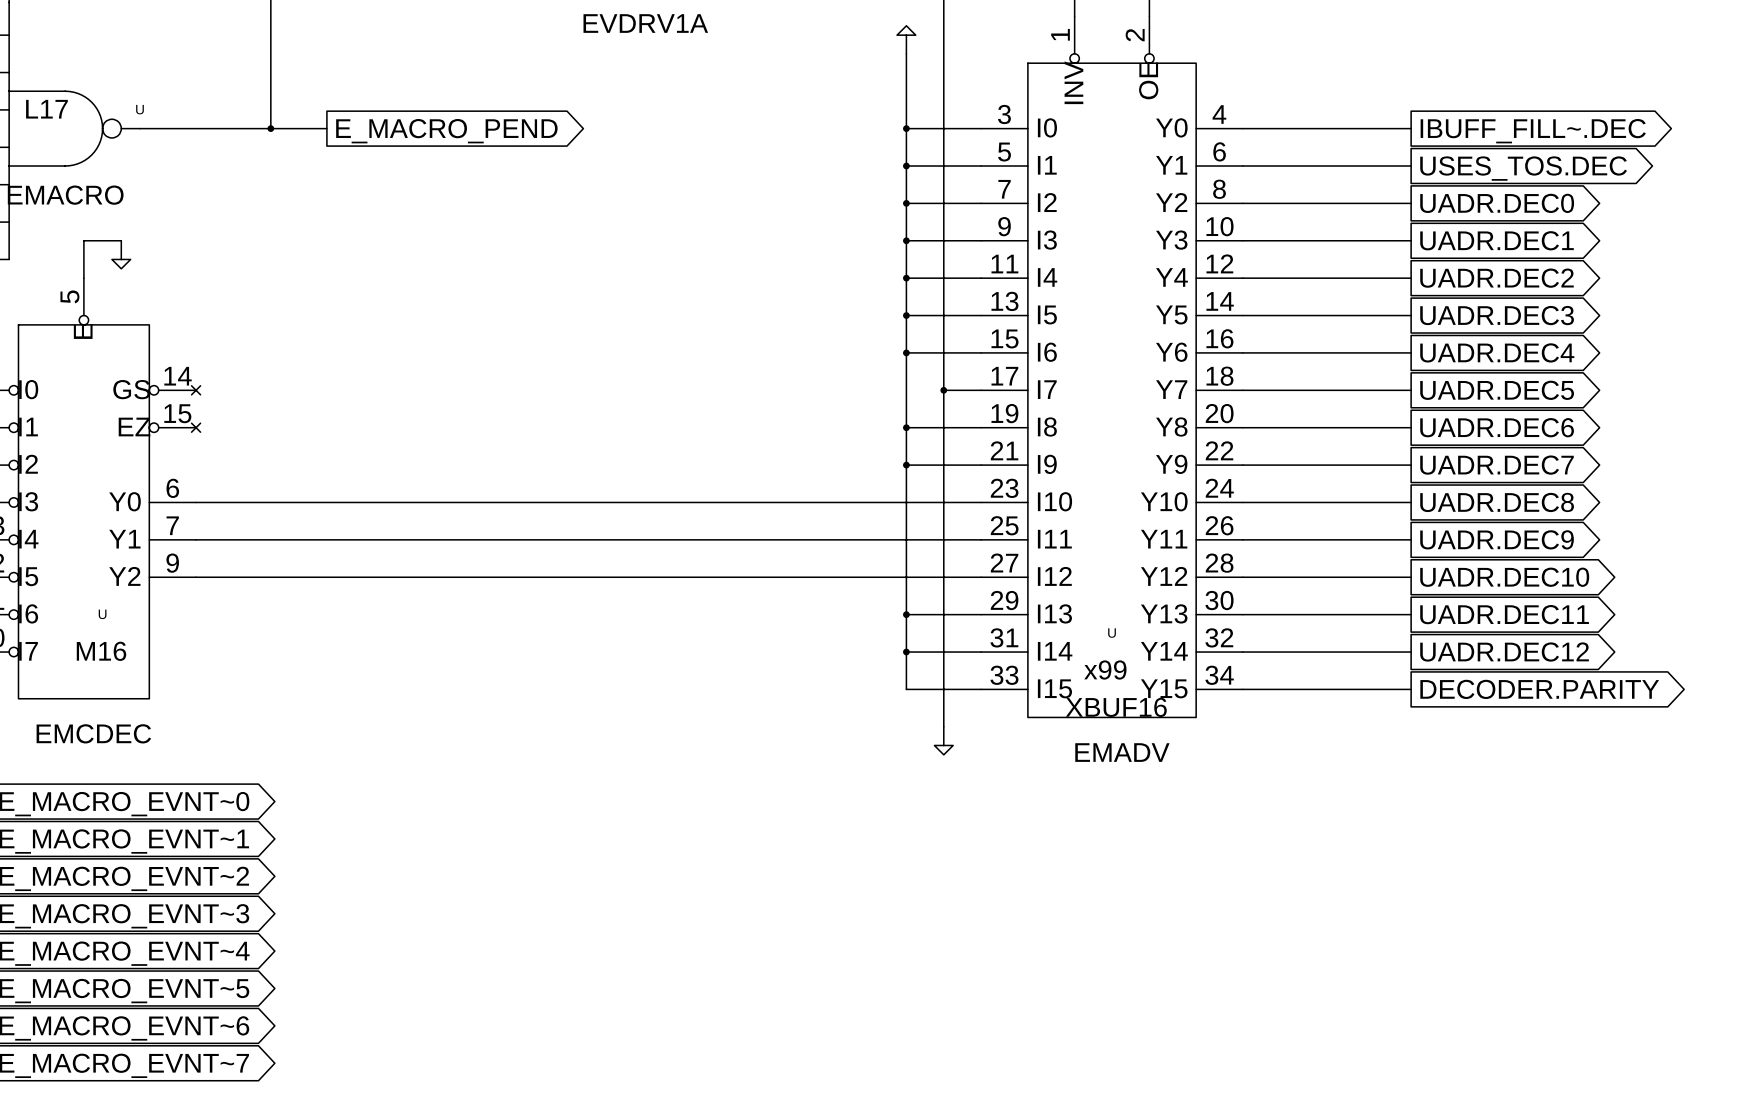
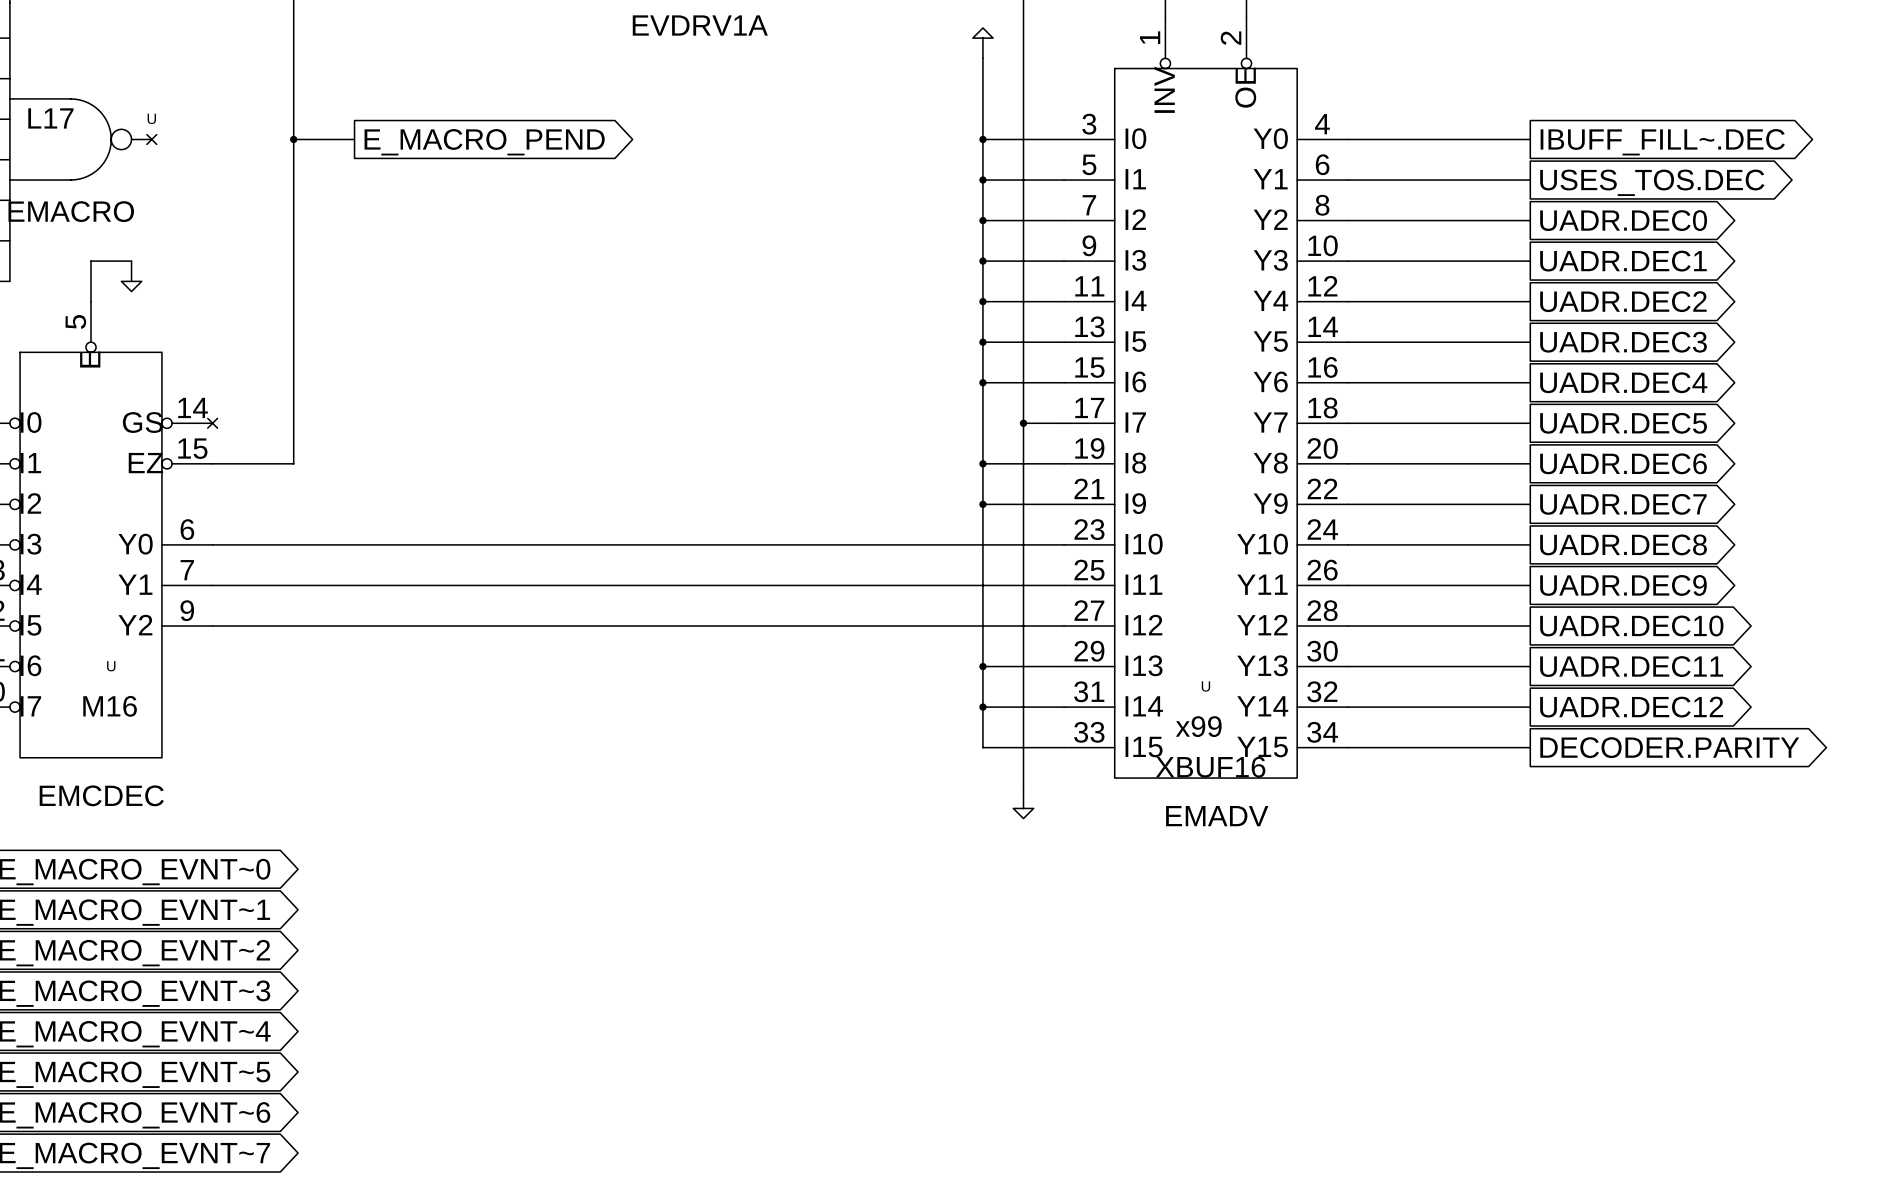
wire: (139, 128) (270, 128) -> (212, 463) (293, 463) (293, 139)
no-connect mark: none -> (151, 139)
no-connect mark: (196, 427) -> none

